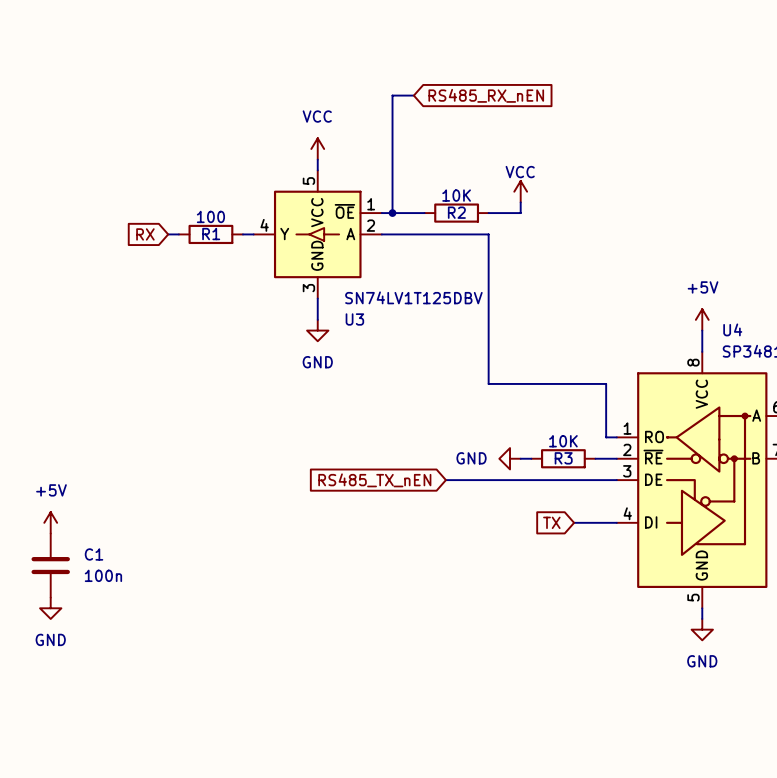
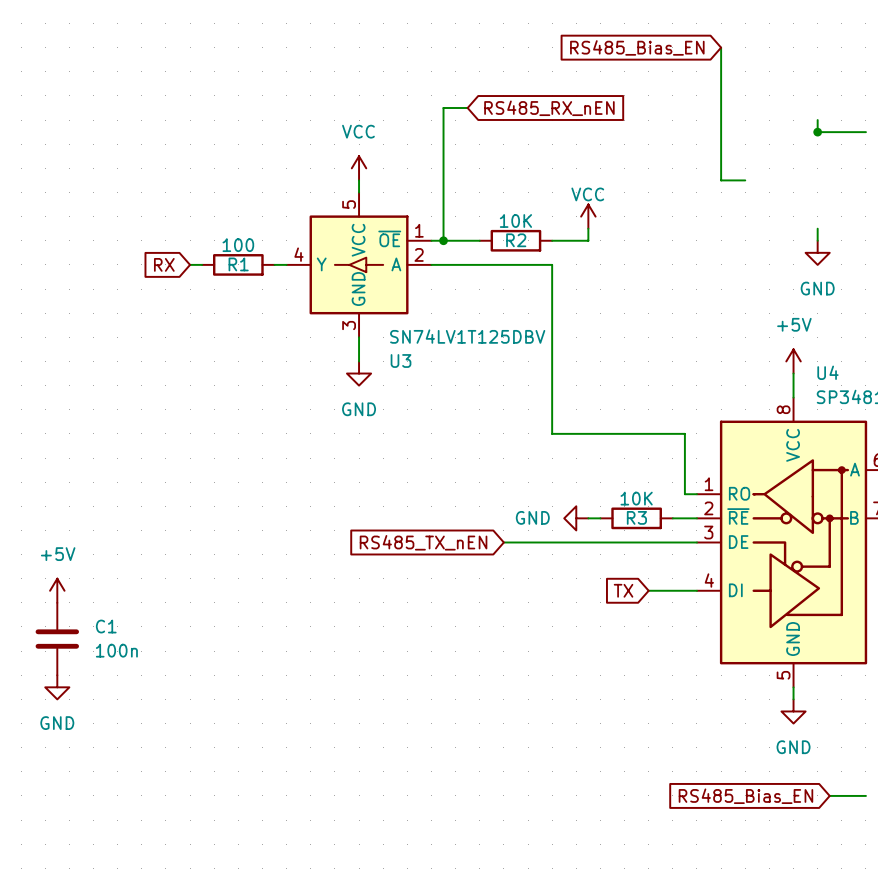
global label: none -> RS485_Bias_EN (637, 47)
wire: none -> (721, 47) (721, 180) (745, 180)
wire: none -> (817, 120) (817, 132) (865, 132)
junction: none -> (817, 132)
wire: none -> (817, 228) (817, 240)
power symbol: none -> GND (817, 252)
global label: none -> RS485_Bias_EN (745, 796)
wire: none -> (829, 795) (865, 795)

